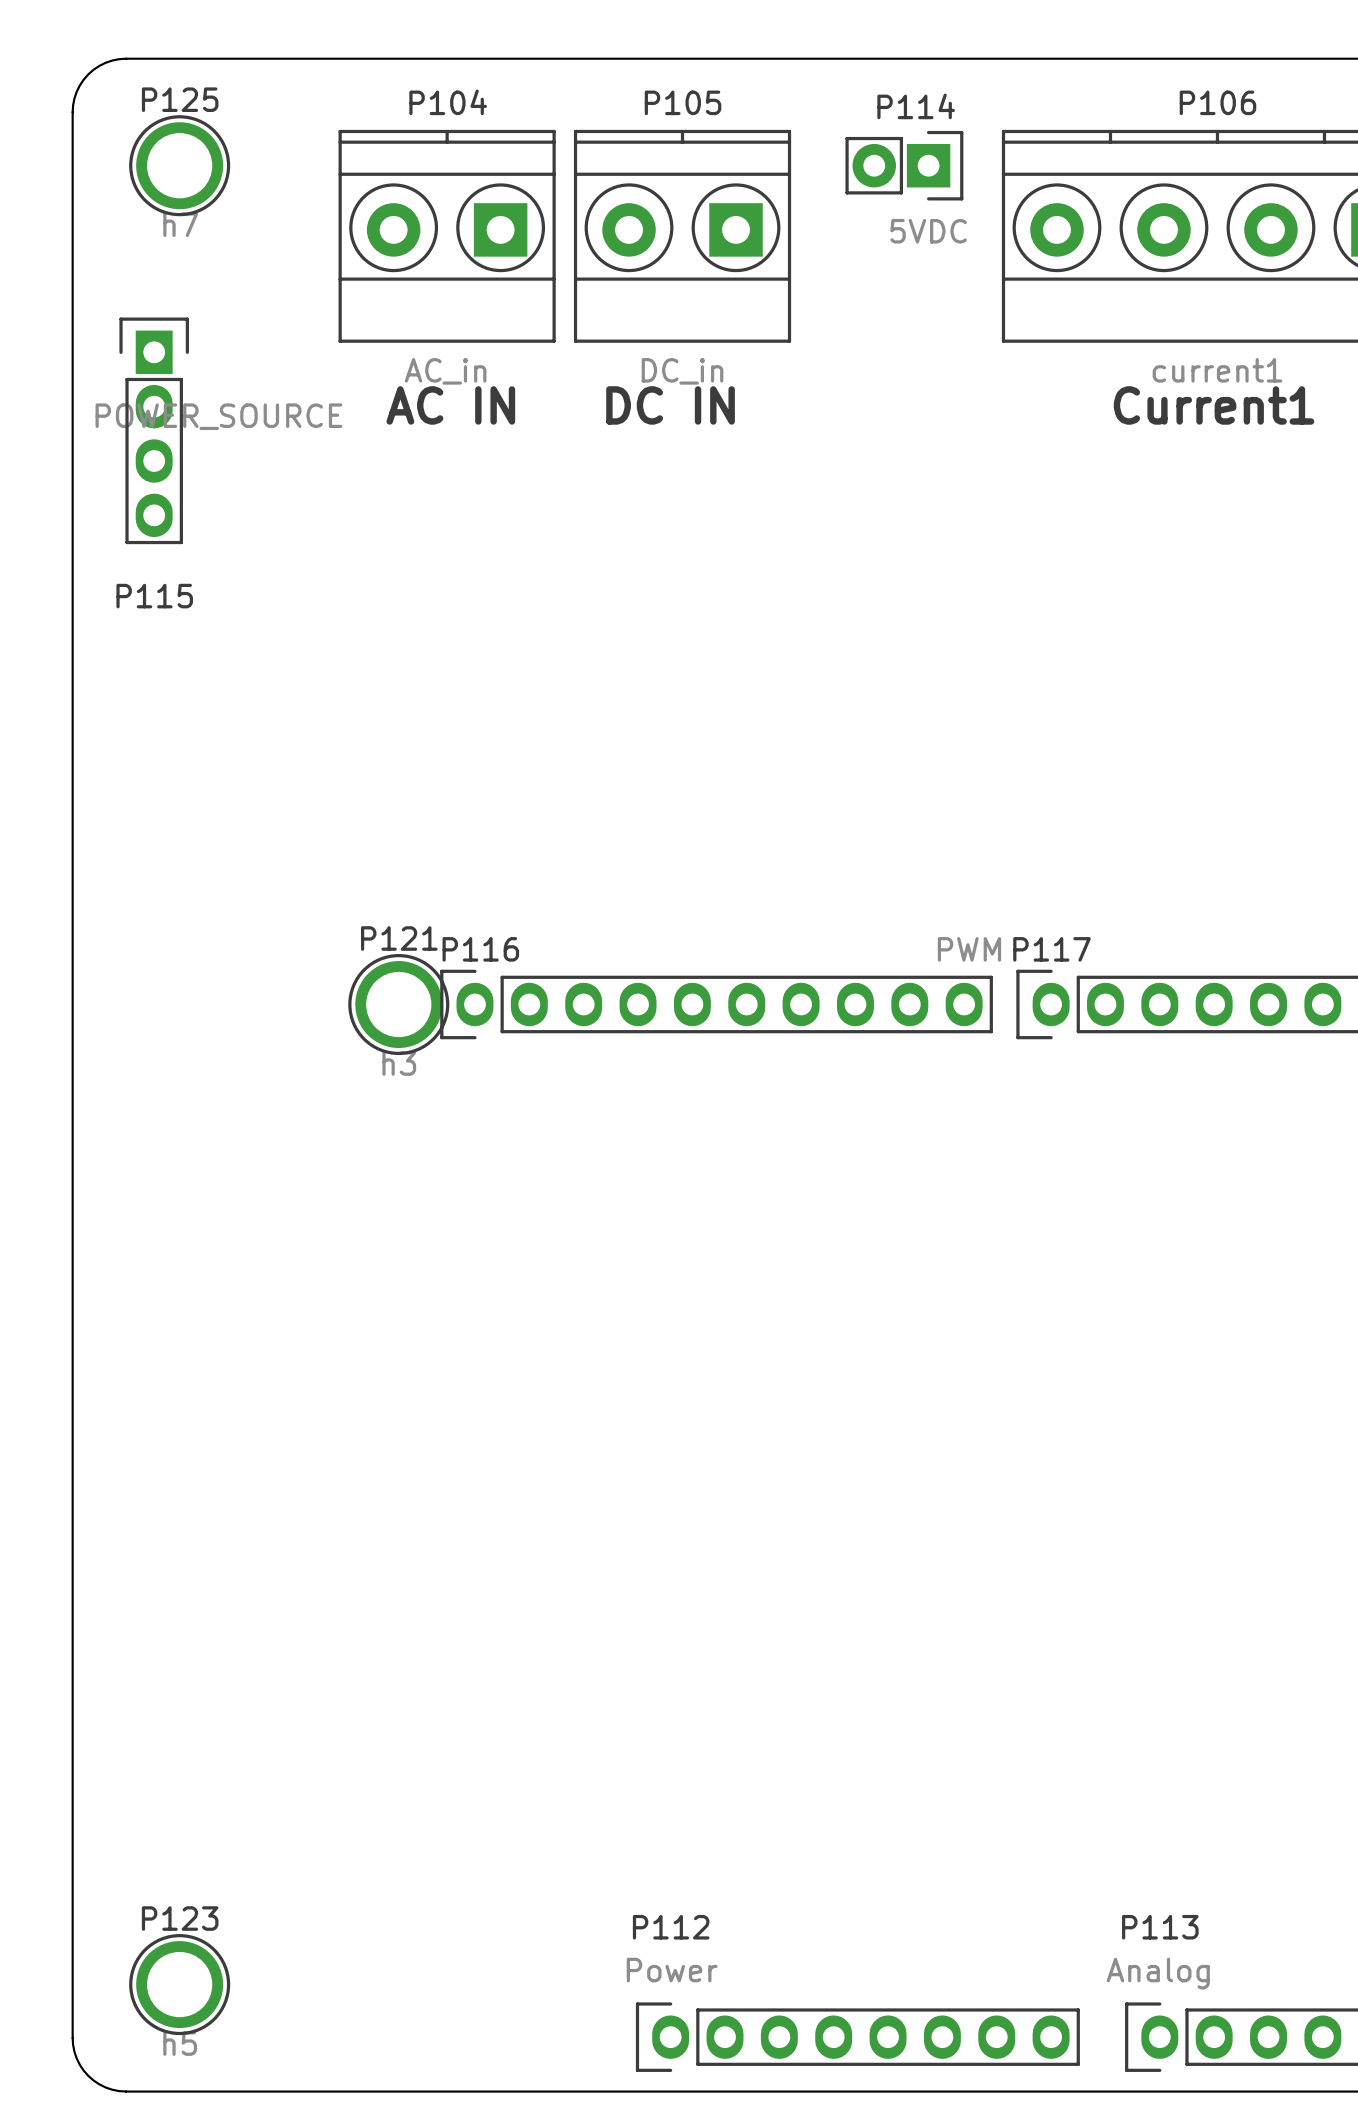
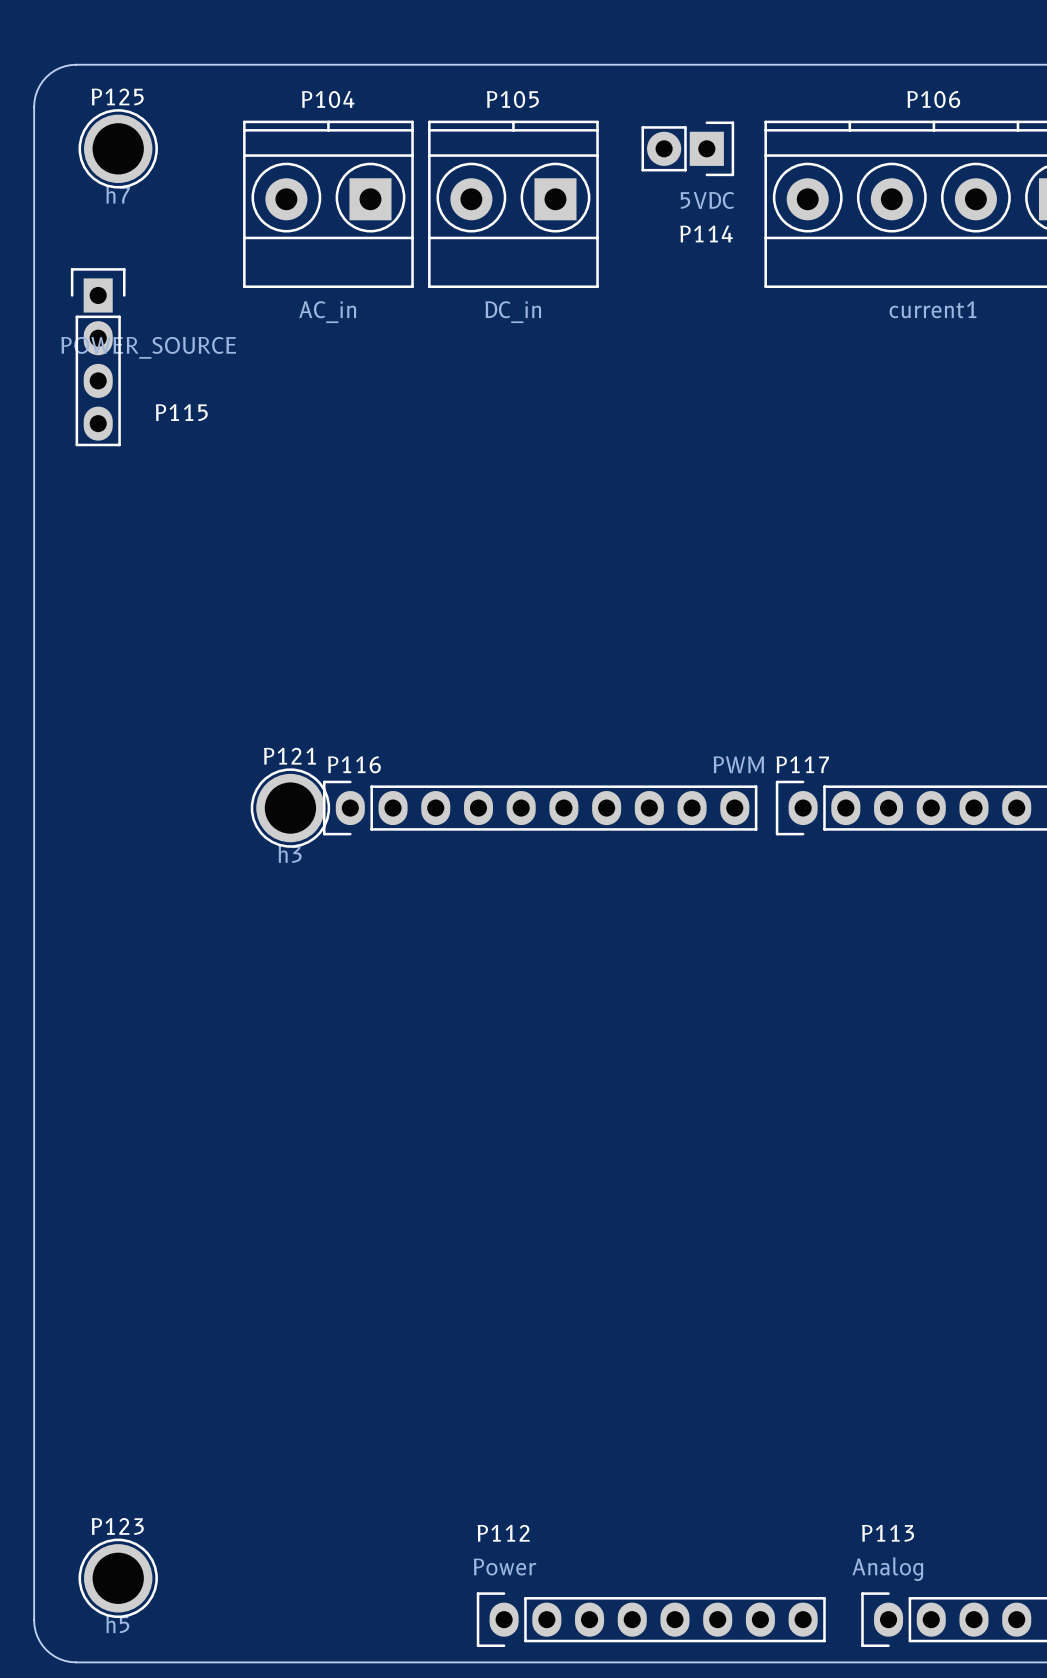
P114 name position: P114 (916, 106) -> P114 (706, 233)
text: AC IN (450, 405) -> none
text: DC IN (670, 405) -> none
text: Current1 (1214, 405) -> none
P115 name position: P115 (154, 596) -> P115 (181, 412)

